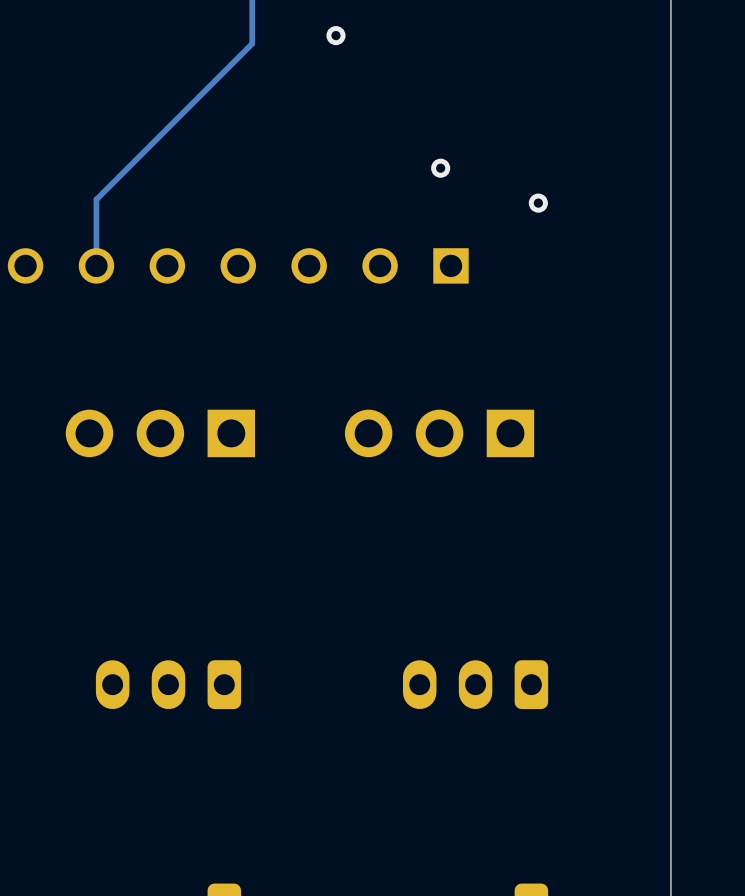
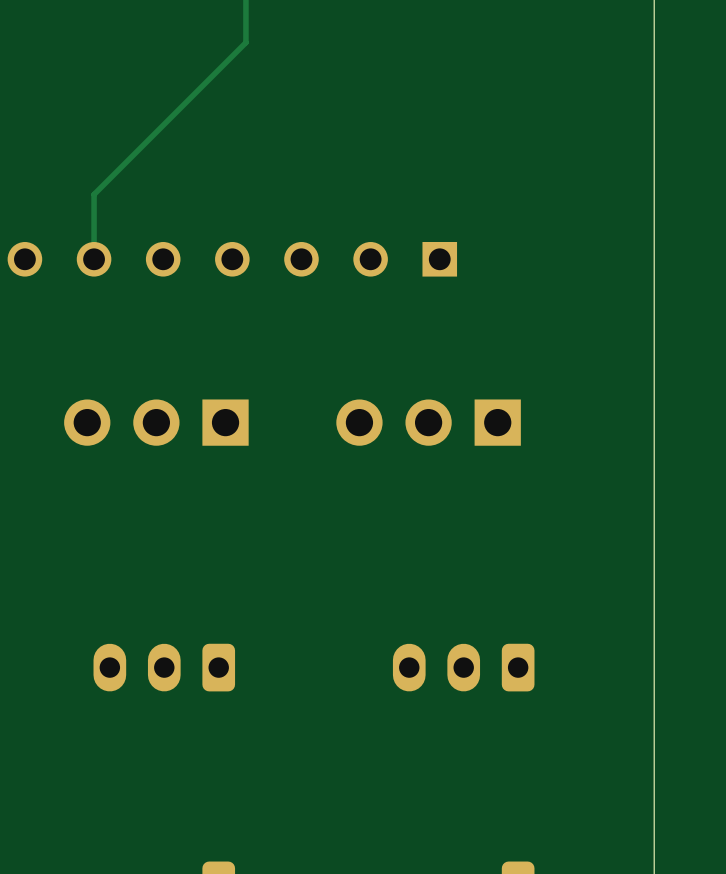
via: (335, 35) -> none
via: (440, 168) -> none
via: (538, 203) -> none

